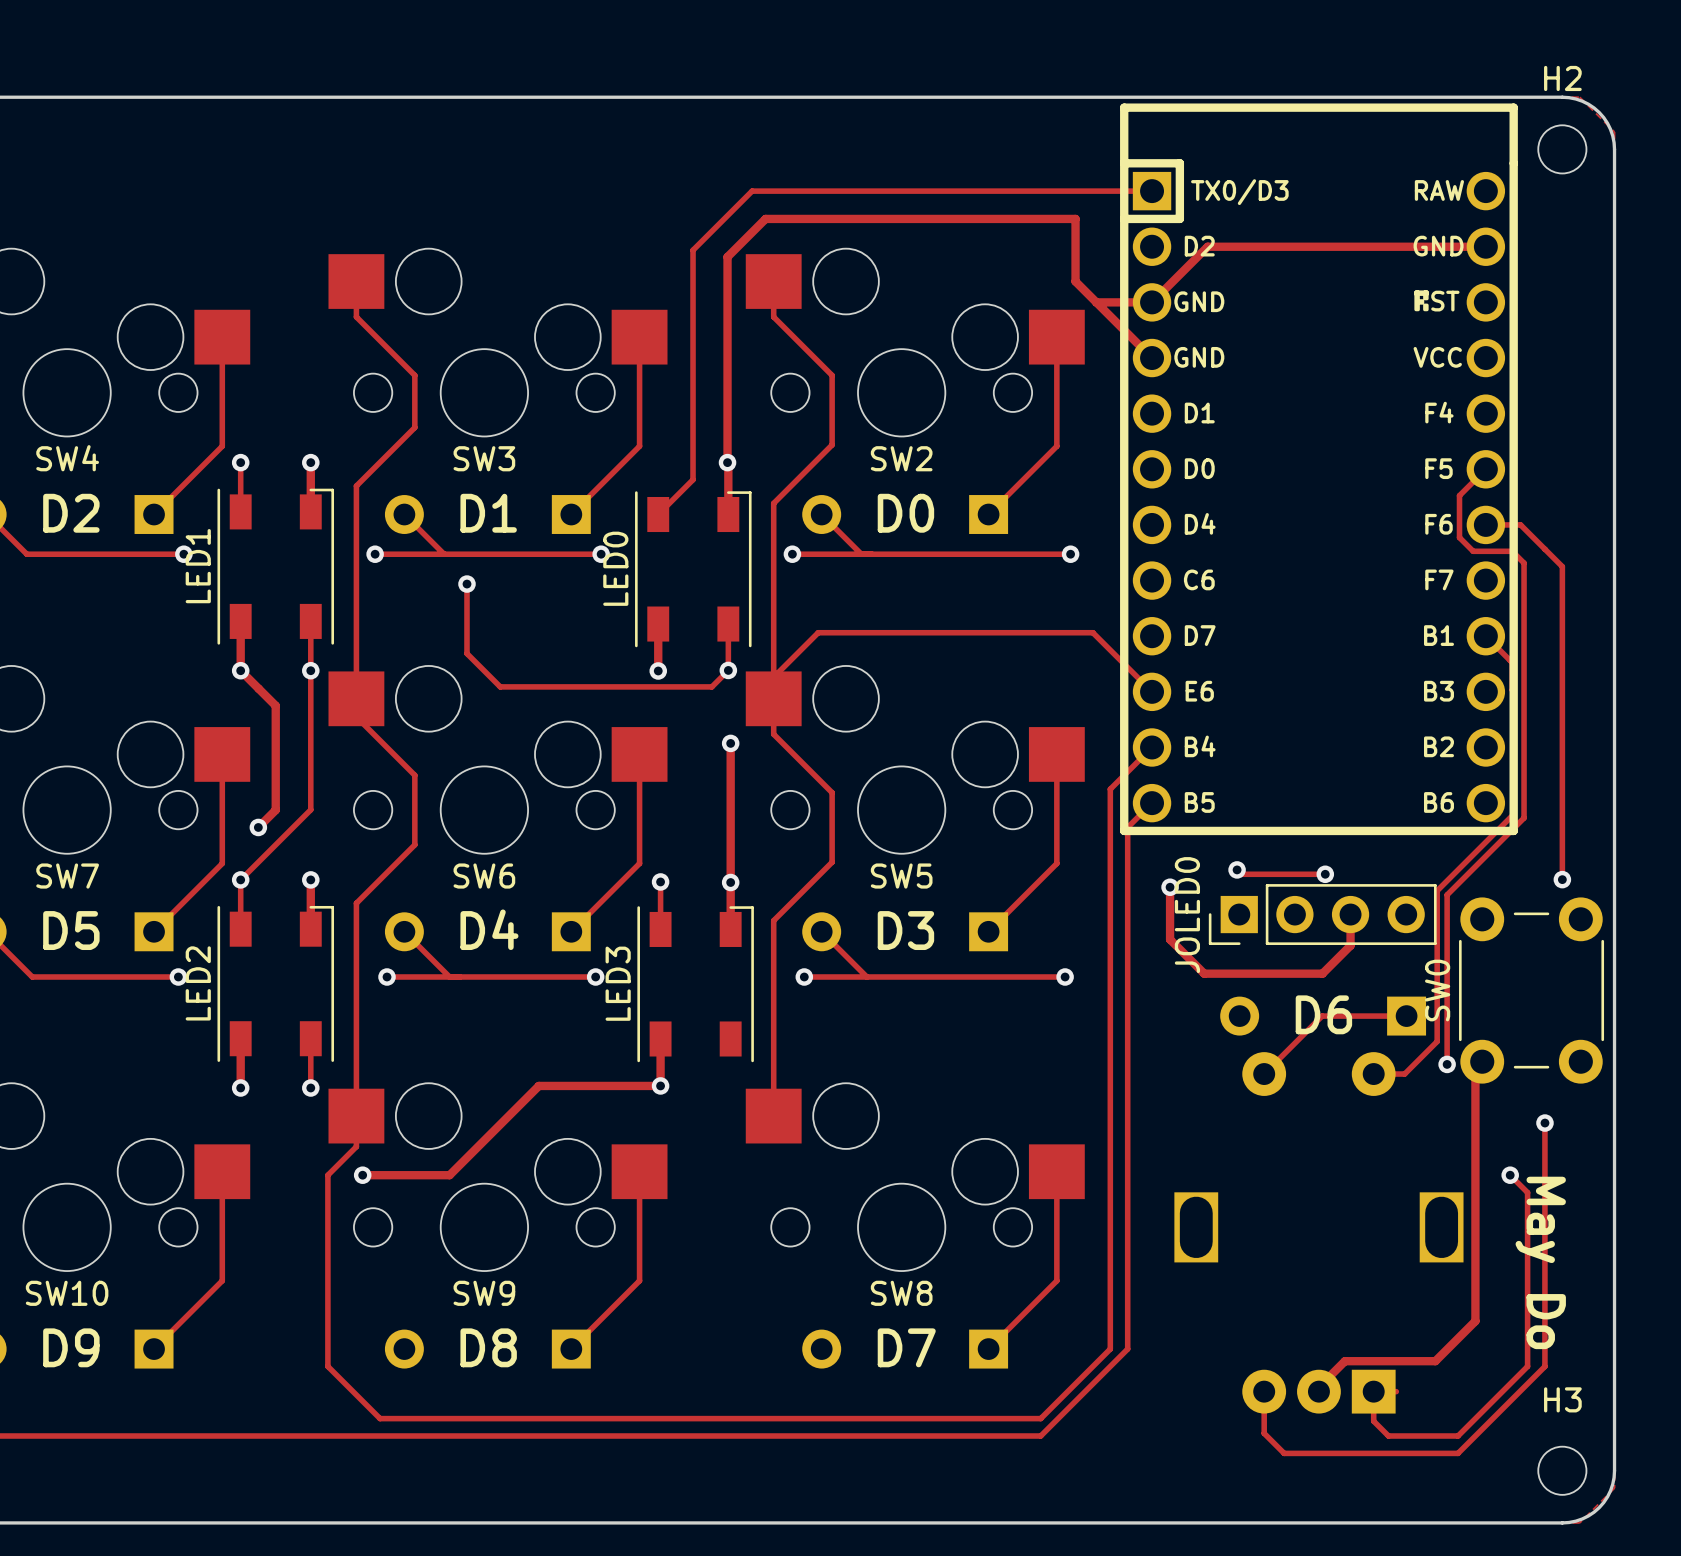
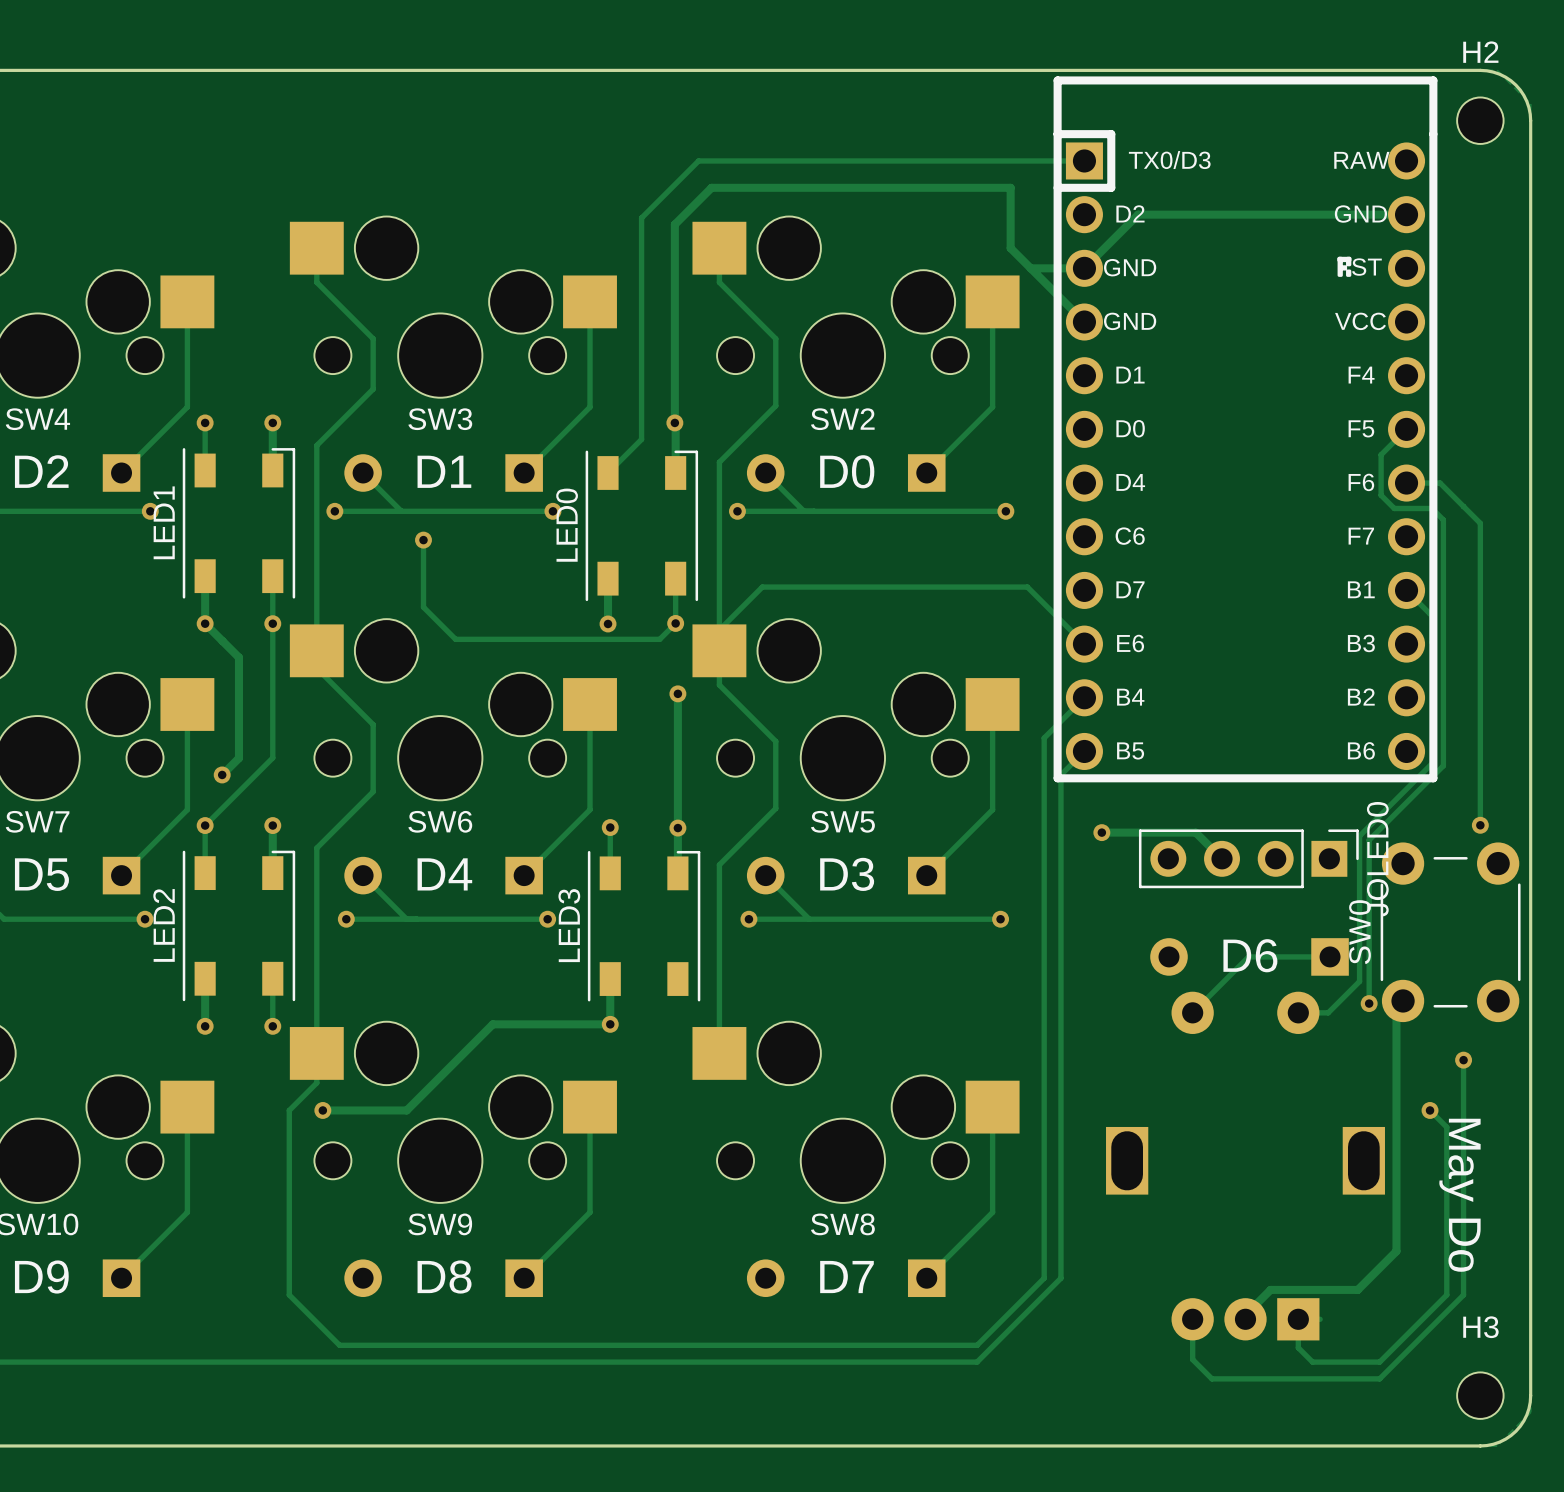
track: (1237, 869) (1241, 874) (1325, 874) -> none
via: (1237, 869) -> none
via: (1325, 874) -> none
track: (1170, 887) (1170, 939) (1204, 973) (1322, 973) (1350, 945) (1350, 914) -> (1101, 832) (1195, 832) (1222, 858)
JOLED0 rotation: 0° (1322, 914) -> 180° (1248, 858)

